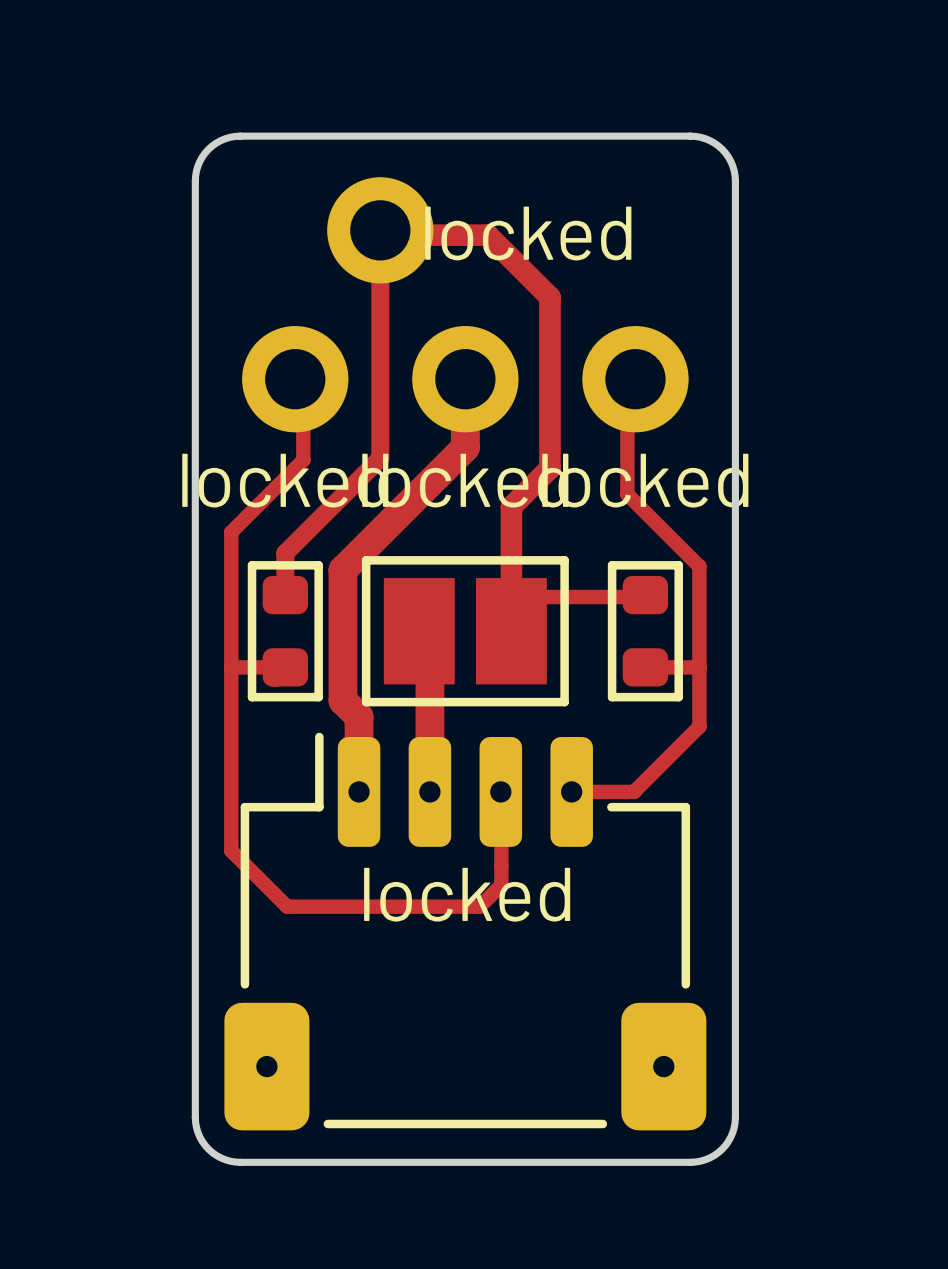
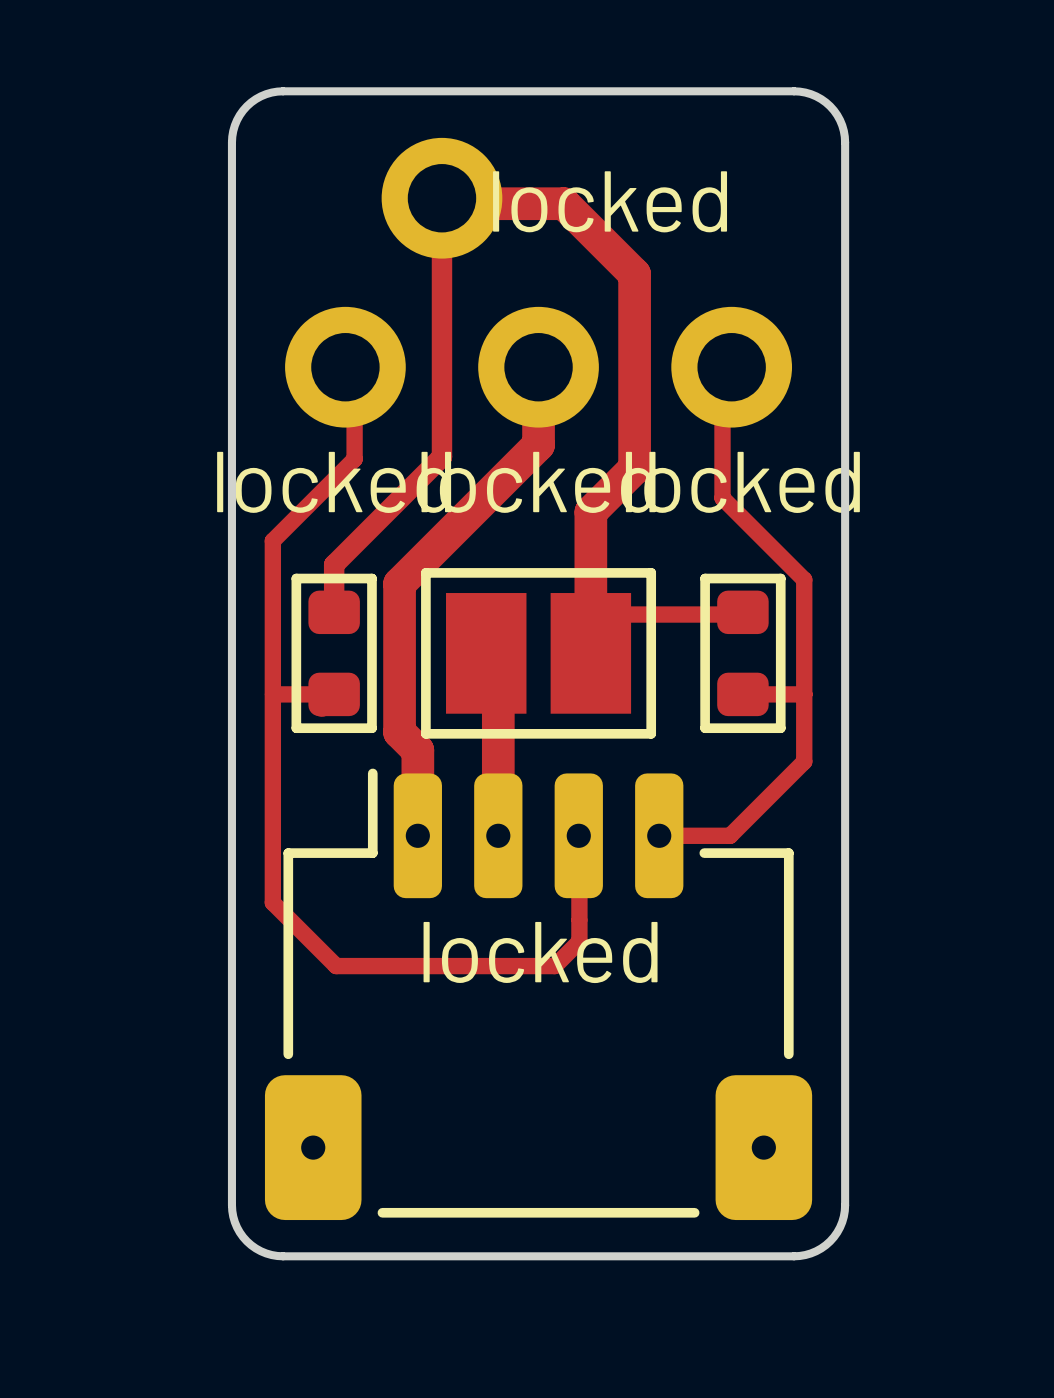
track width: thin (384, 235) (487, 235) (549, 297) (549, 468) (511, 506) (511, 604) -> thick (446, 203) (564, 203) (634, 274) (634, 468) (590, 512) (590, 622)

